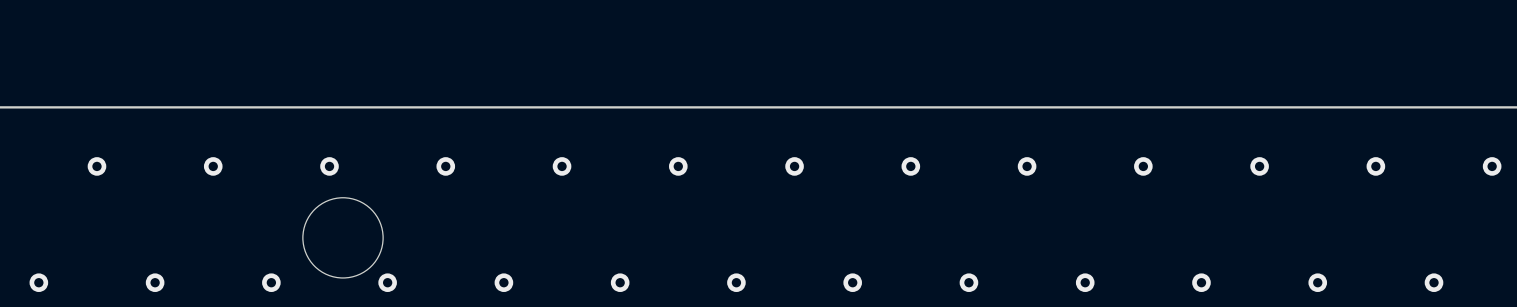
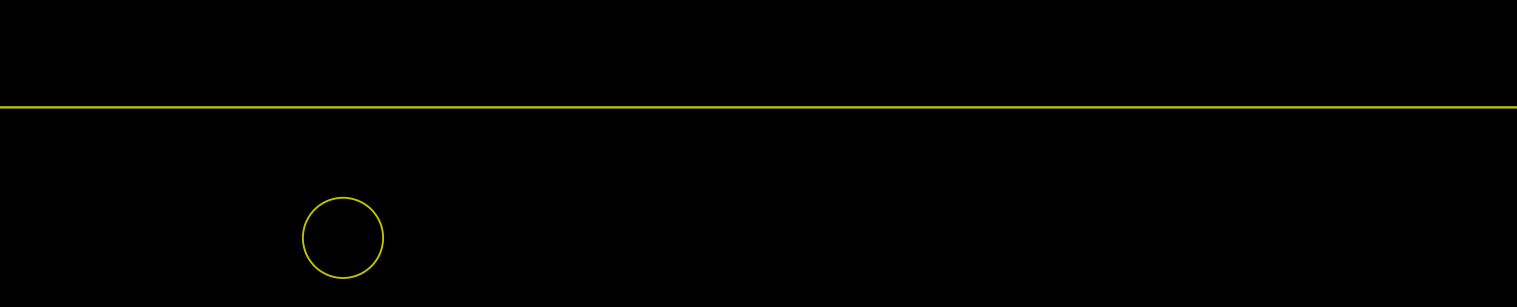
via: (96, 166) -> none
via: (213, 166) -> none
via: (329, 166) -> none
via: (445, 166) -> none
via: (562, 166) -> none
via: (678, 166) -> none
via: (794, 166) -> none
via: (910, 166) -> none
via: (1027, 166) -> none
via: (1143, 166) -> none
via: (1259, 166) -> none
via: (1375, 166) -> none
via: (1492, 166) -> none
via: (38, 282) -> none
via: (155, 282) -> none
via: (271, 282) -> none
via: (387, 282) -> none
via: (503, 282) -> none
via: (620, 282) -> none
via: (736, 282) -> none
via: (852, 282) -> none
via: (968, 282) -> none
via: (1085, 282) -> none
via: (1201, 282) -> none
via: (1317, 282) -> none
via: (1434, 282) -> none

